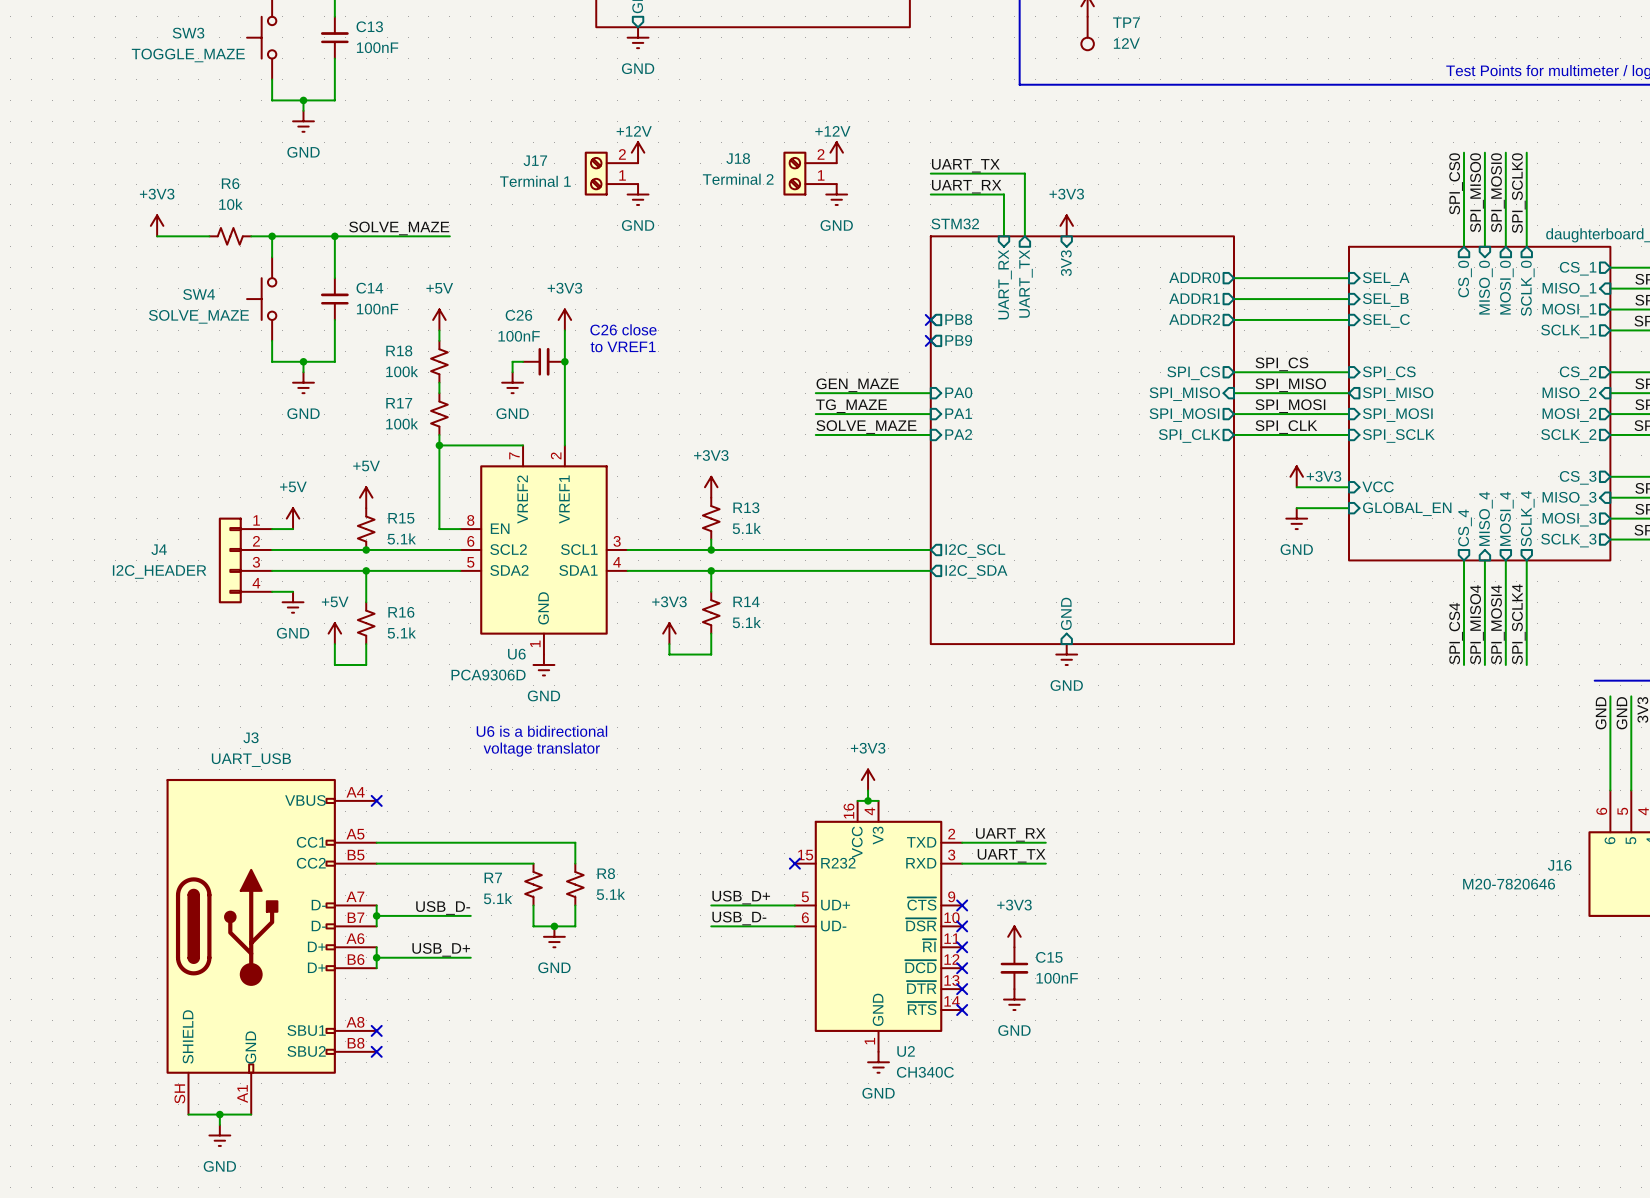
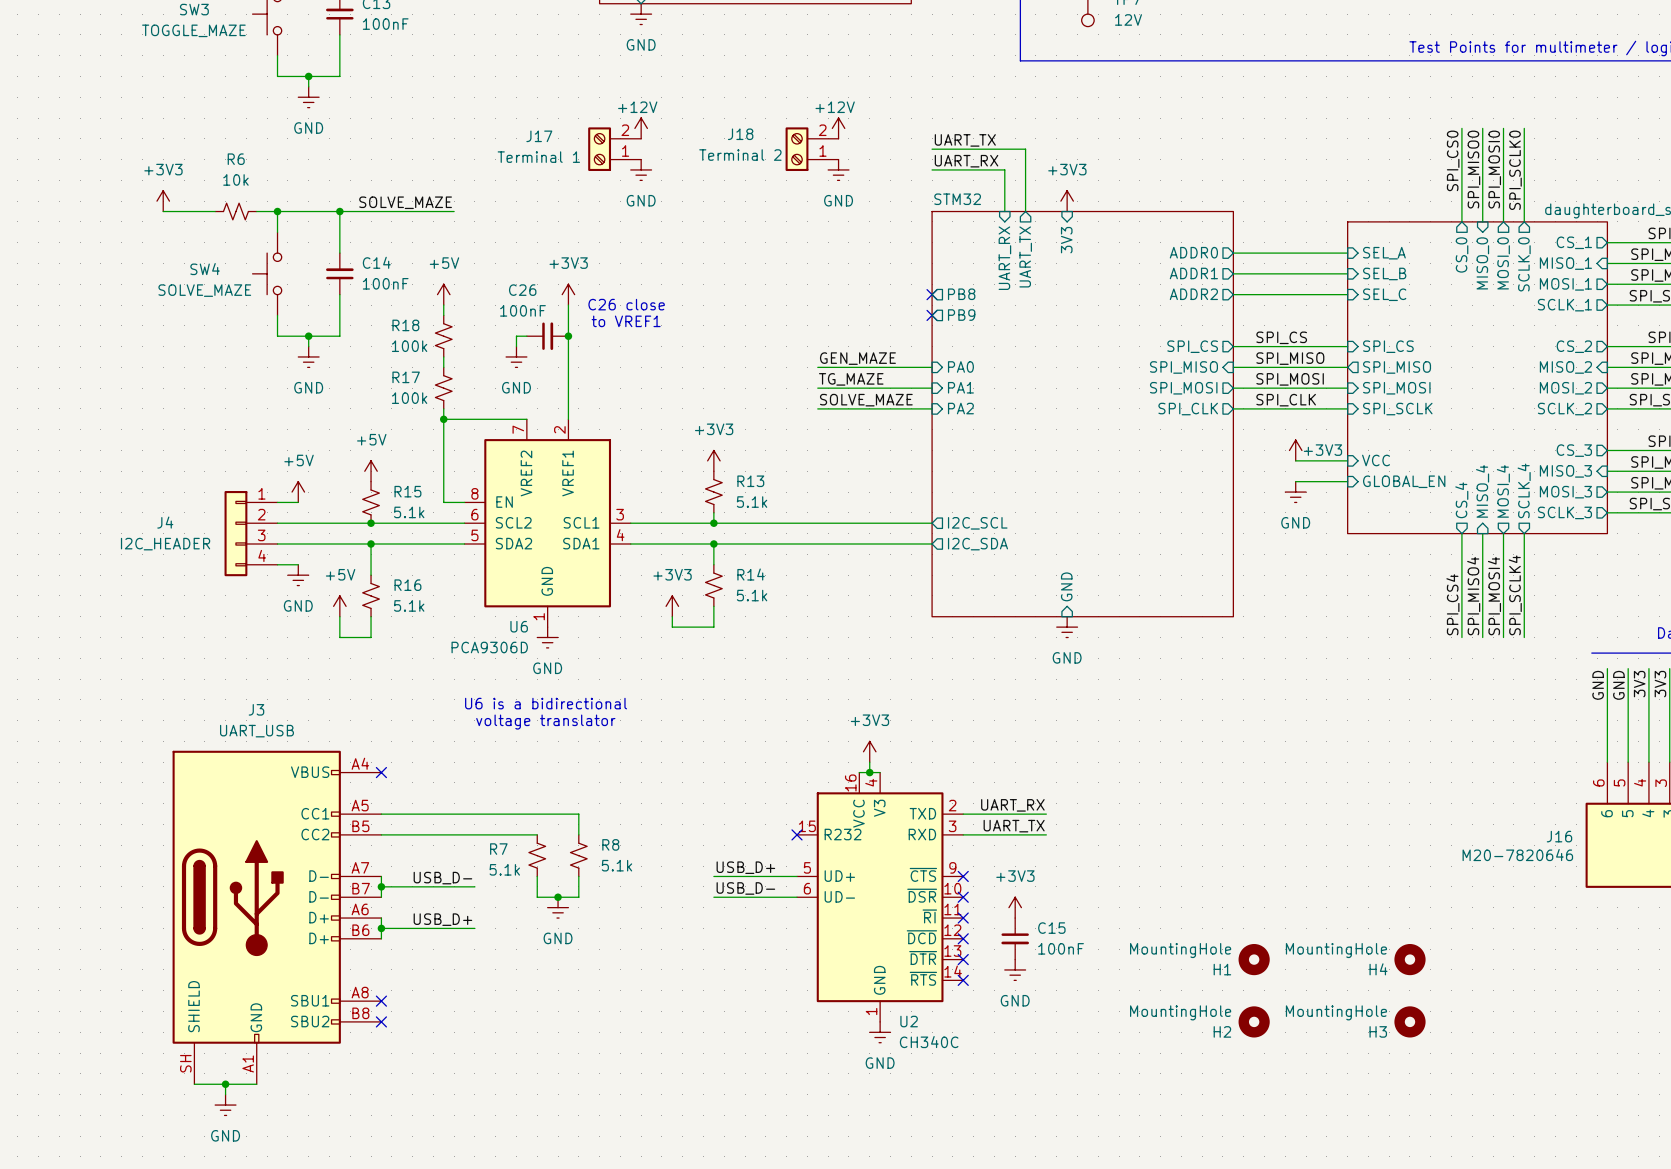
H1: none -> MountingHole (1254, 959)
H4: none -> MountingHole (1409, 959)
H2: none -> MountingHole (1254, 1021)
H3: none -> MountingHole (1409, 1021)

